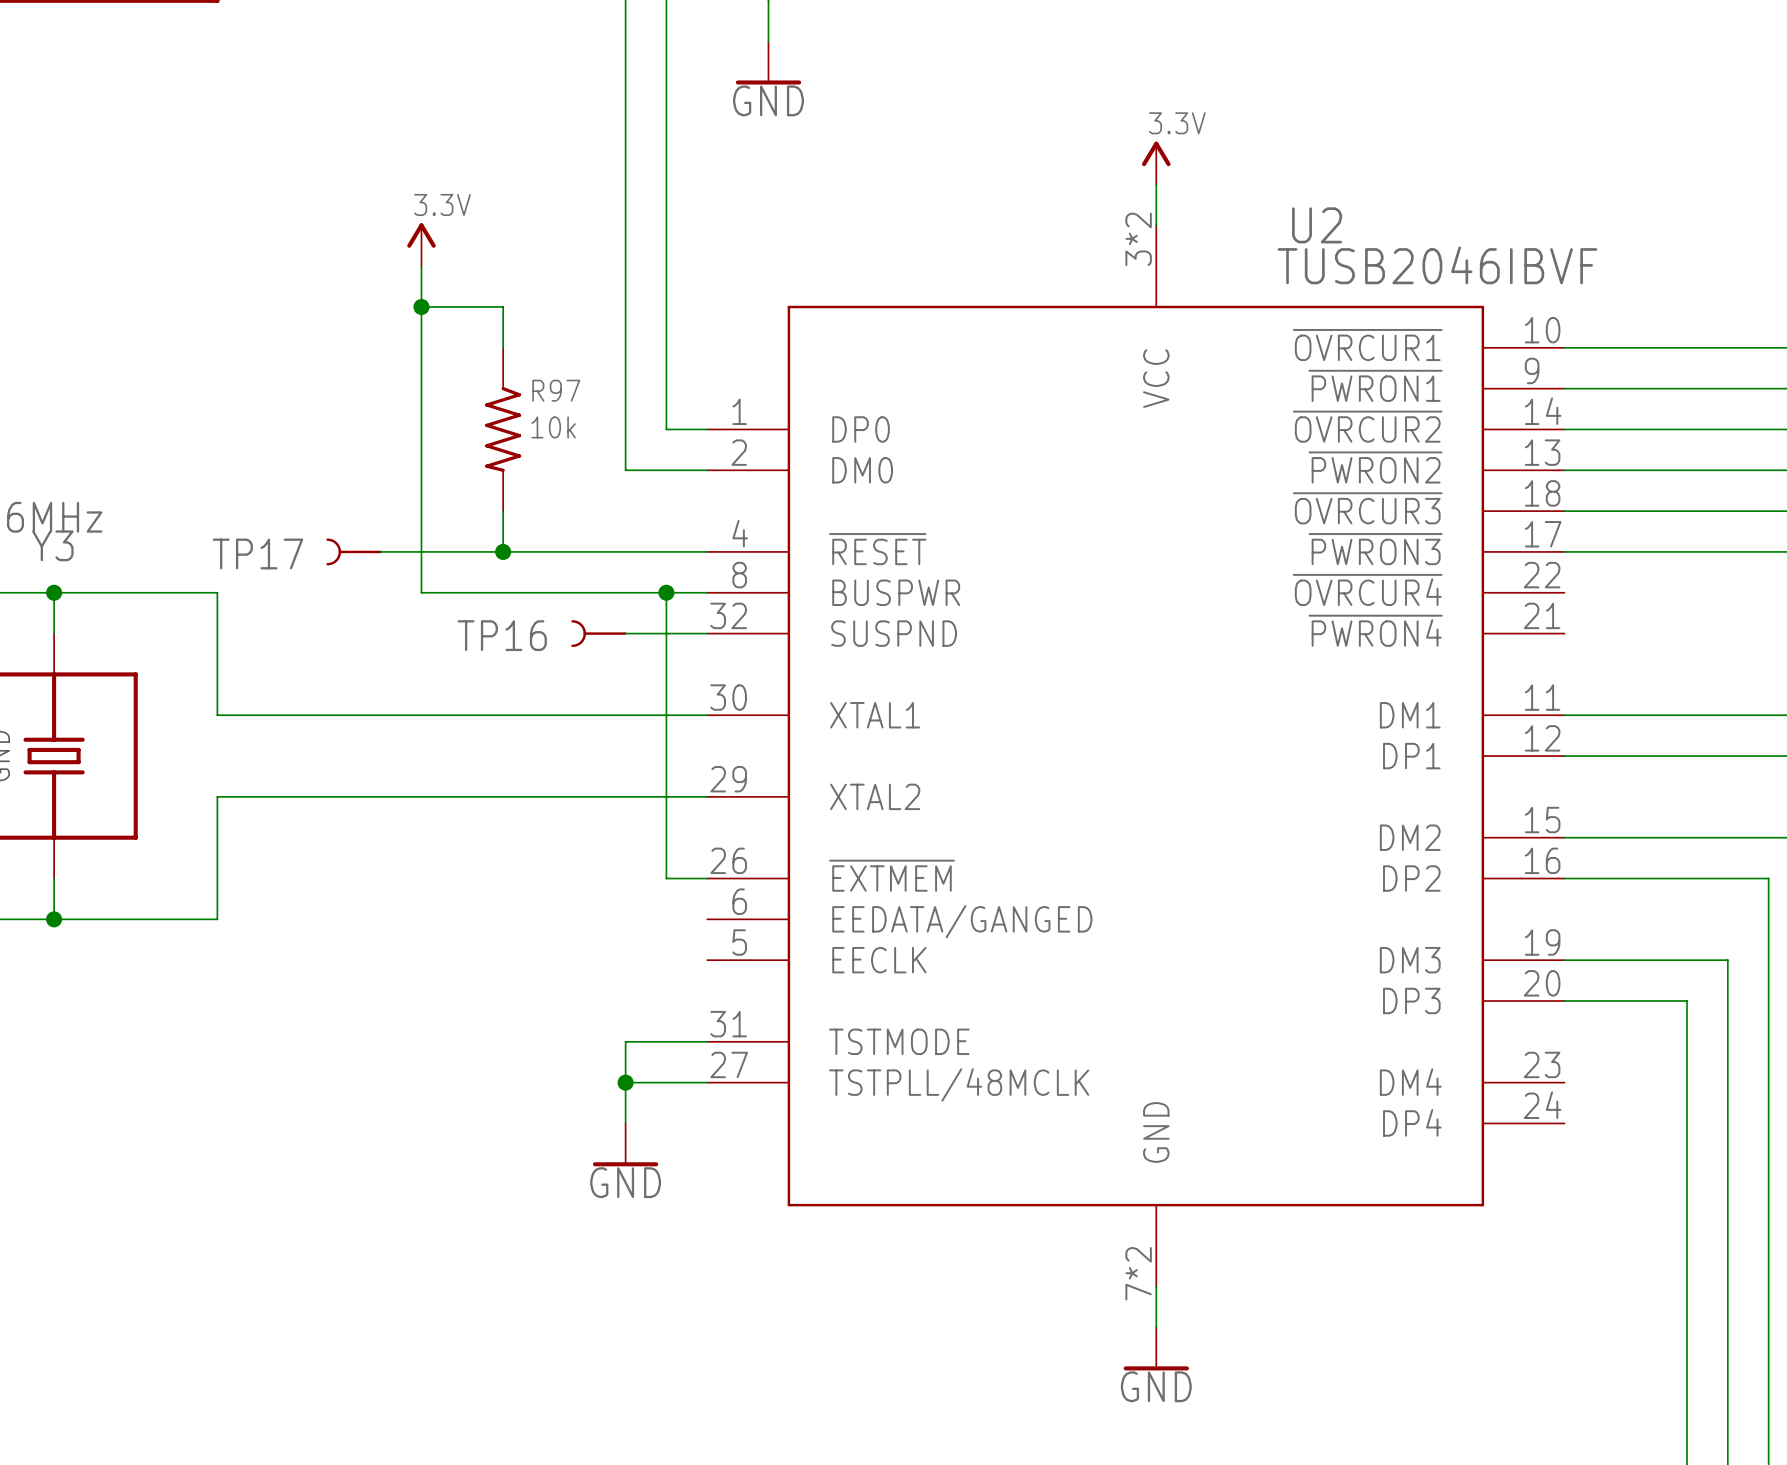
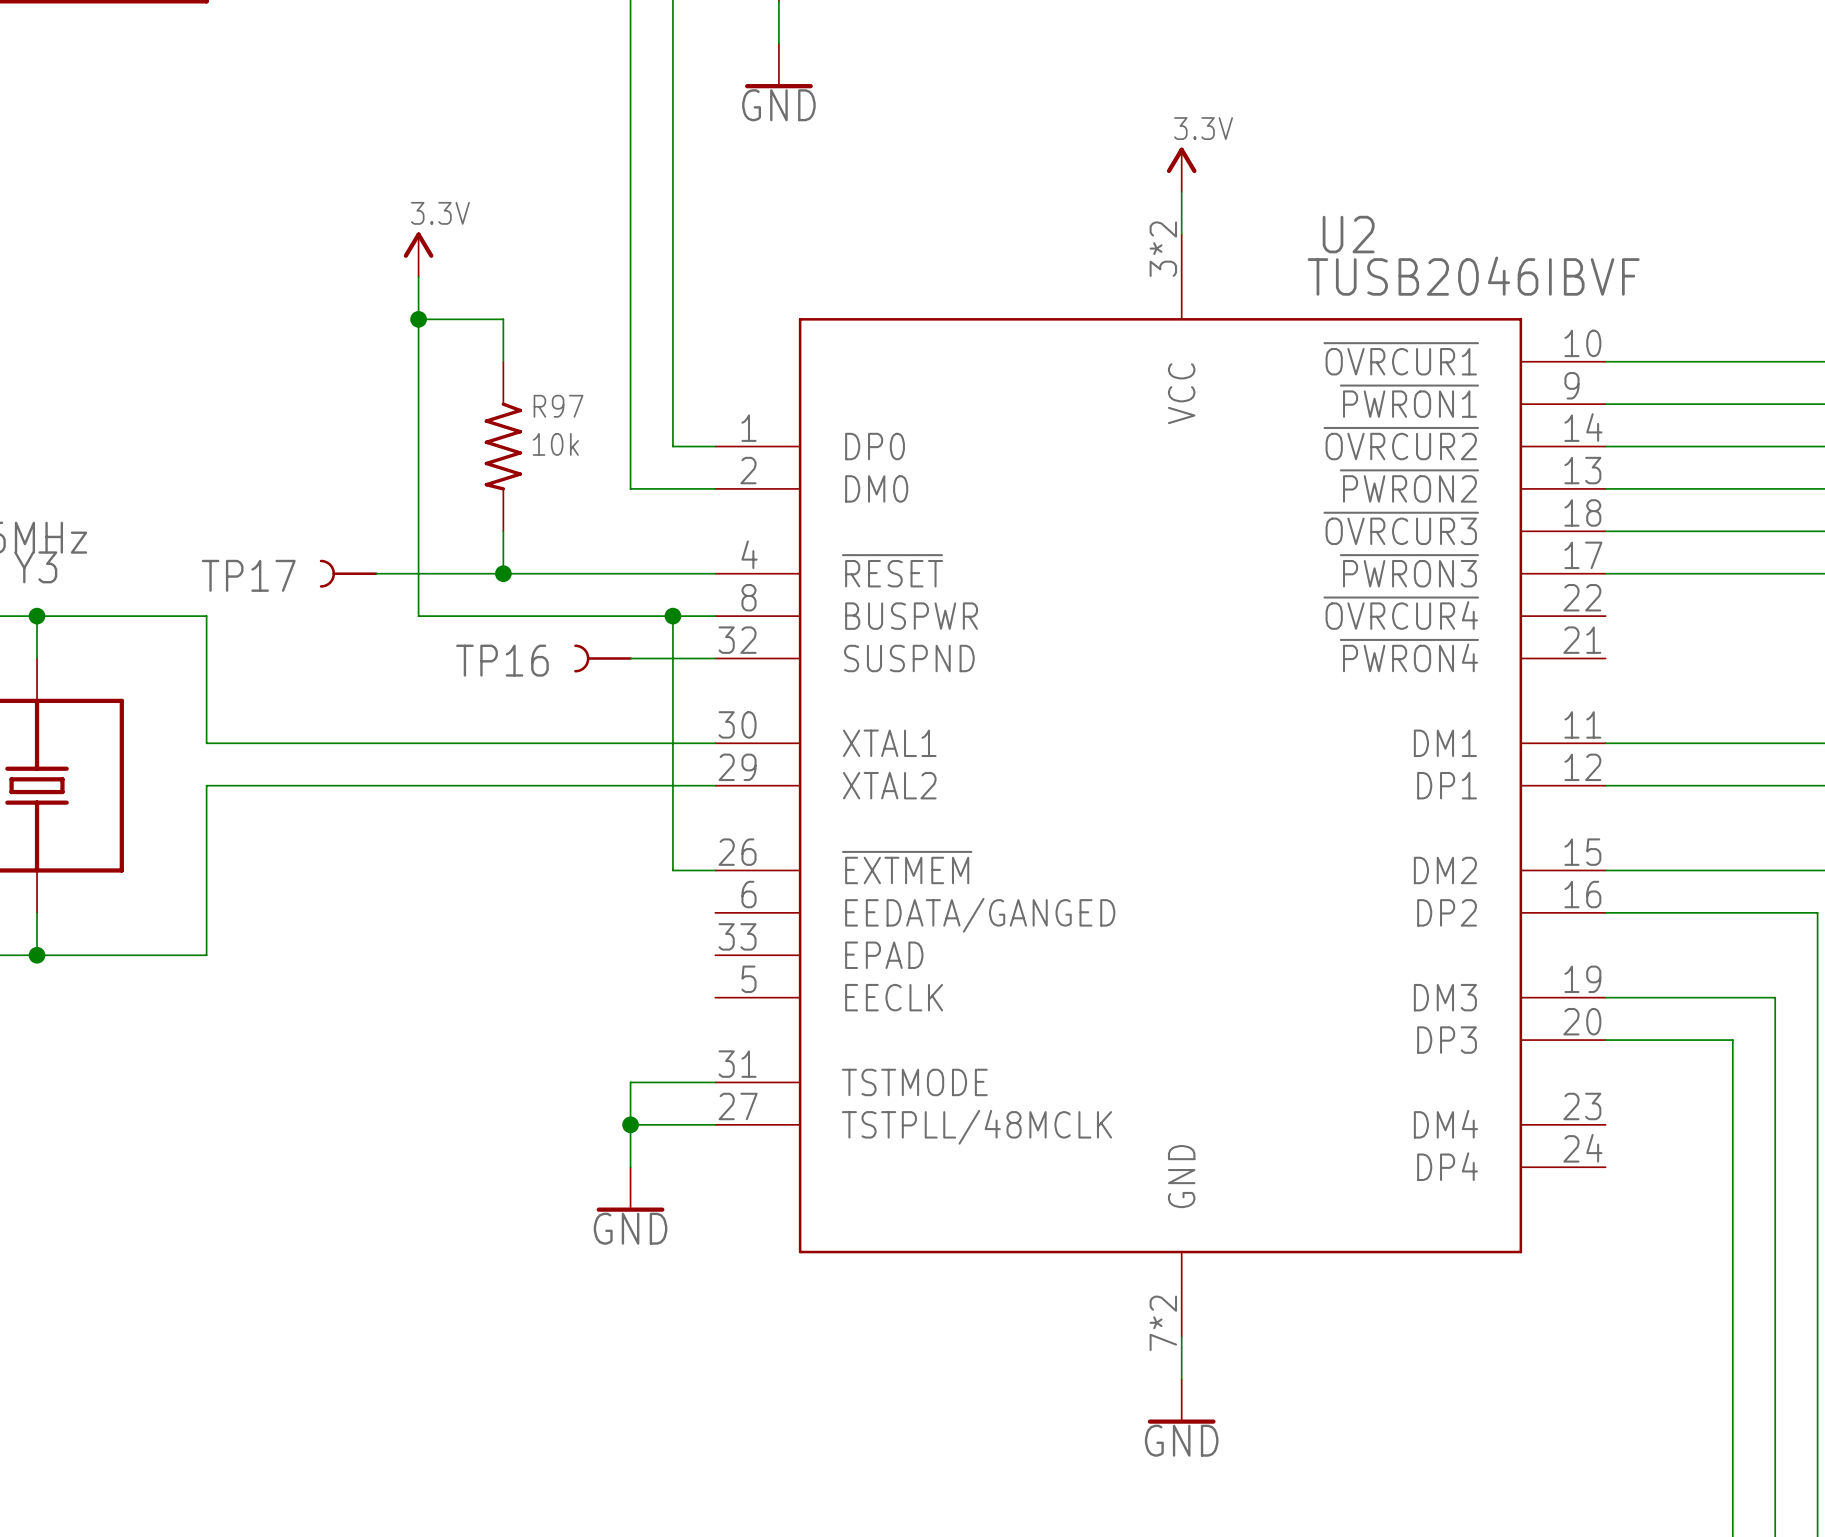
U2 symbol: [707, 225, 1565, 1287] -> [715, 234, 1606, 1337]
wire: (217, 796) (707, 796) -> (206, 828) (206, 785) (715, 785)
wire: (666, 837) (666, 878) (707, 878) -> (672, 870) (715, 870)

